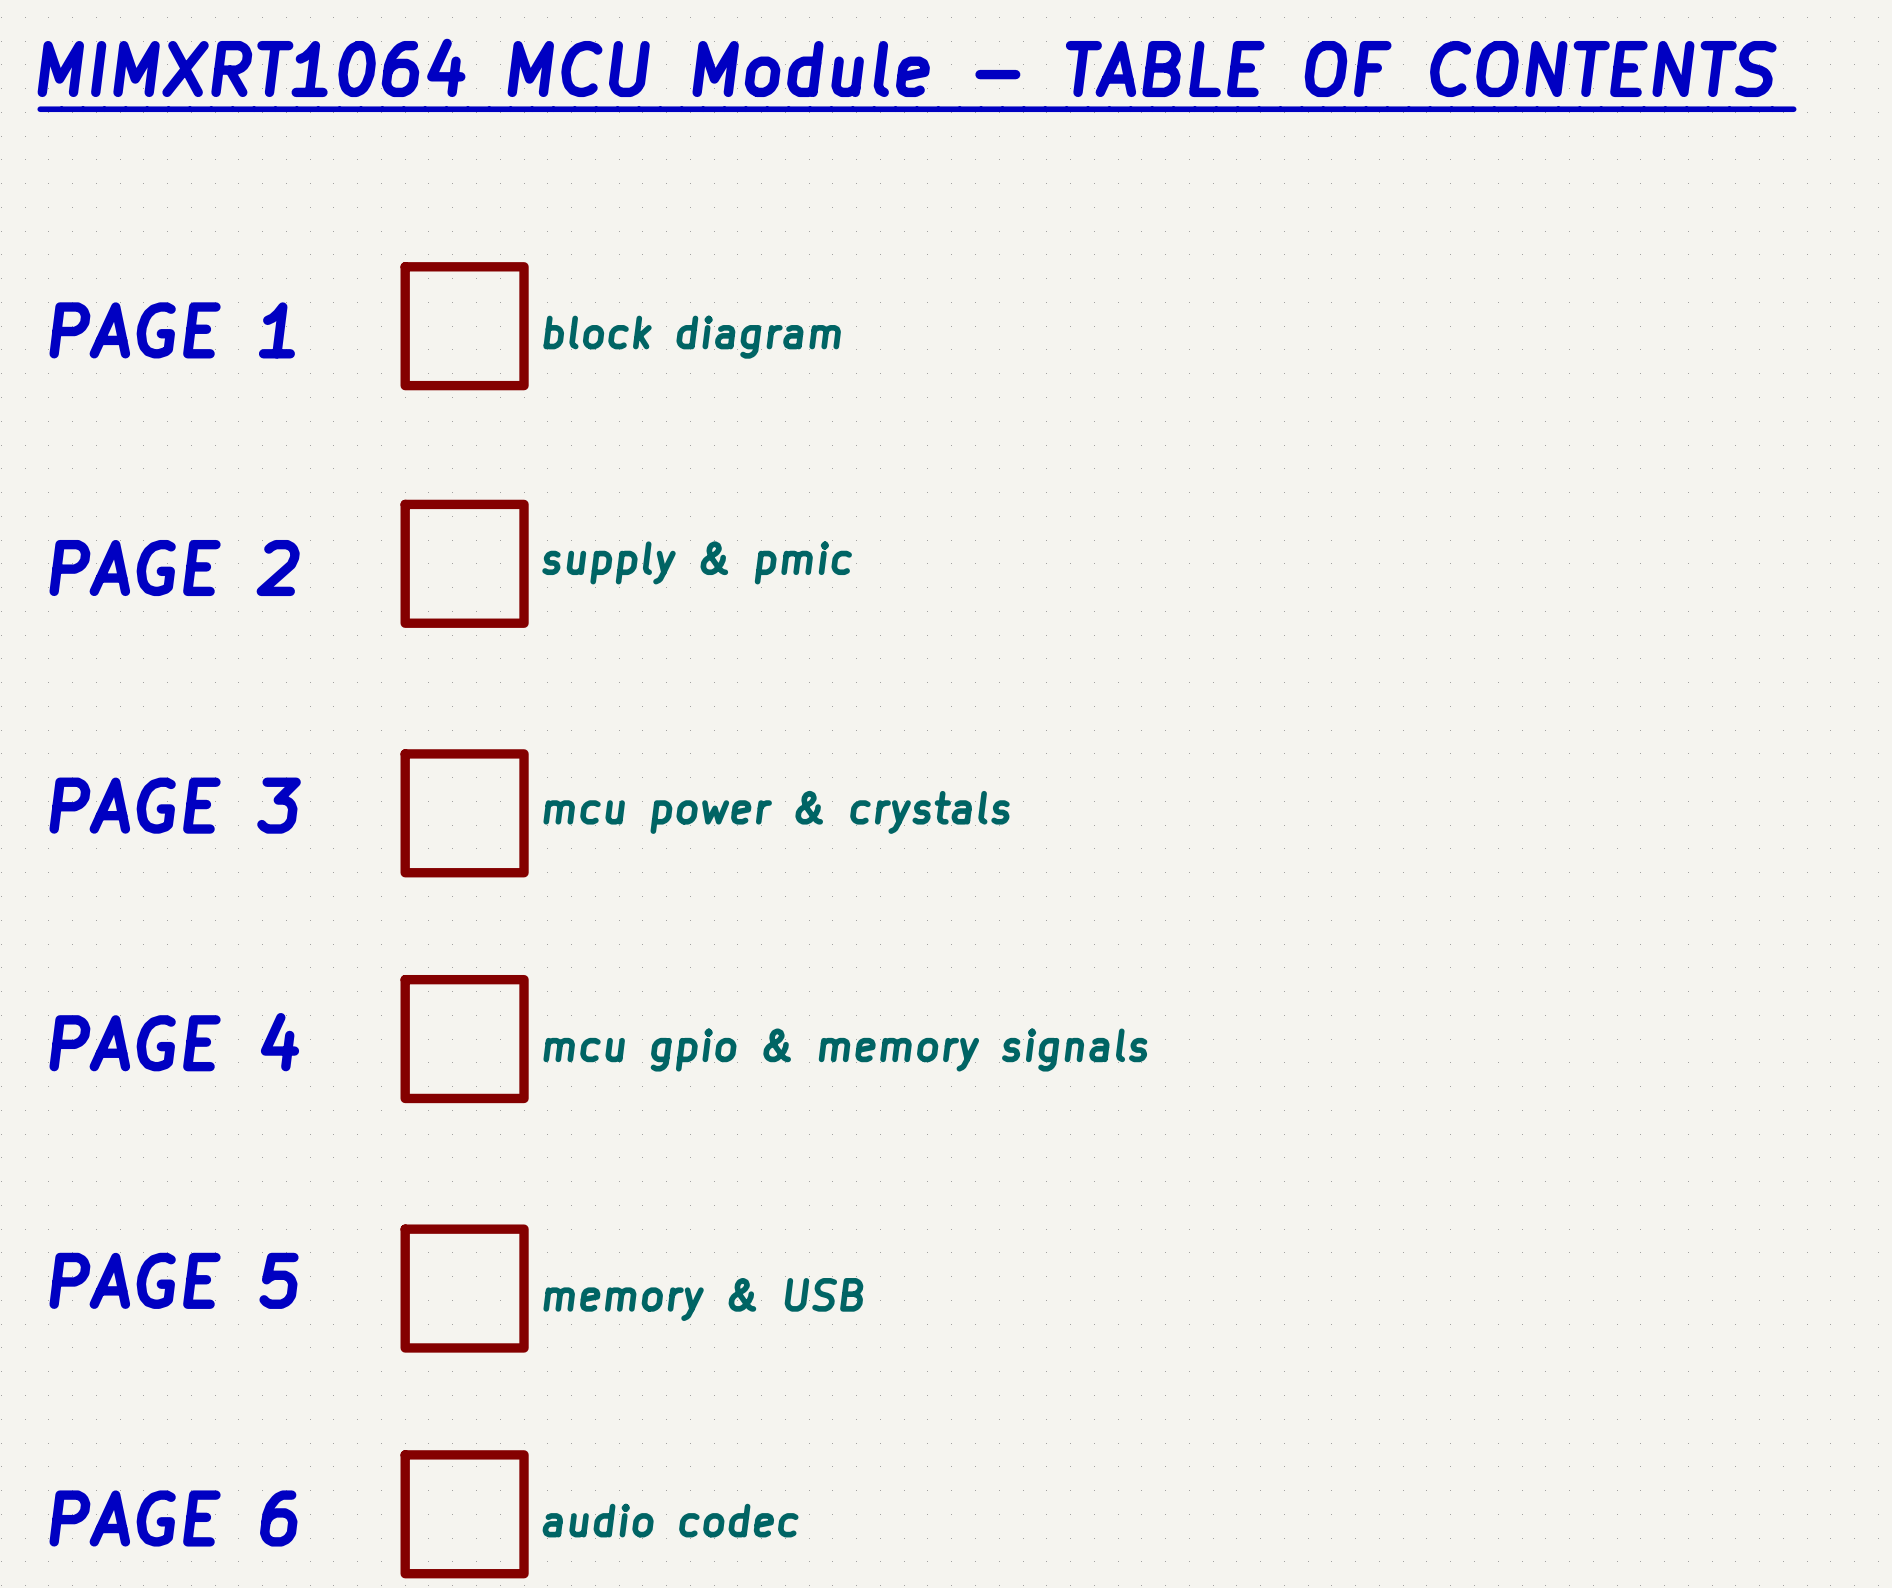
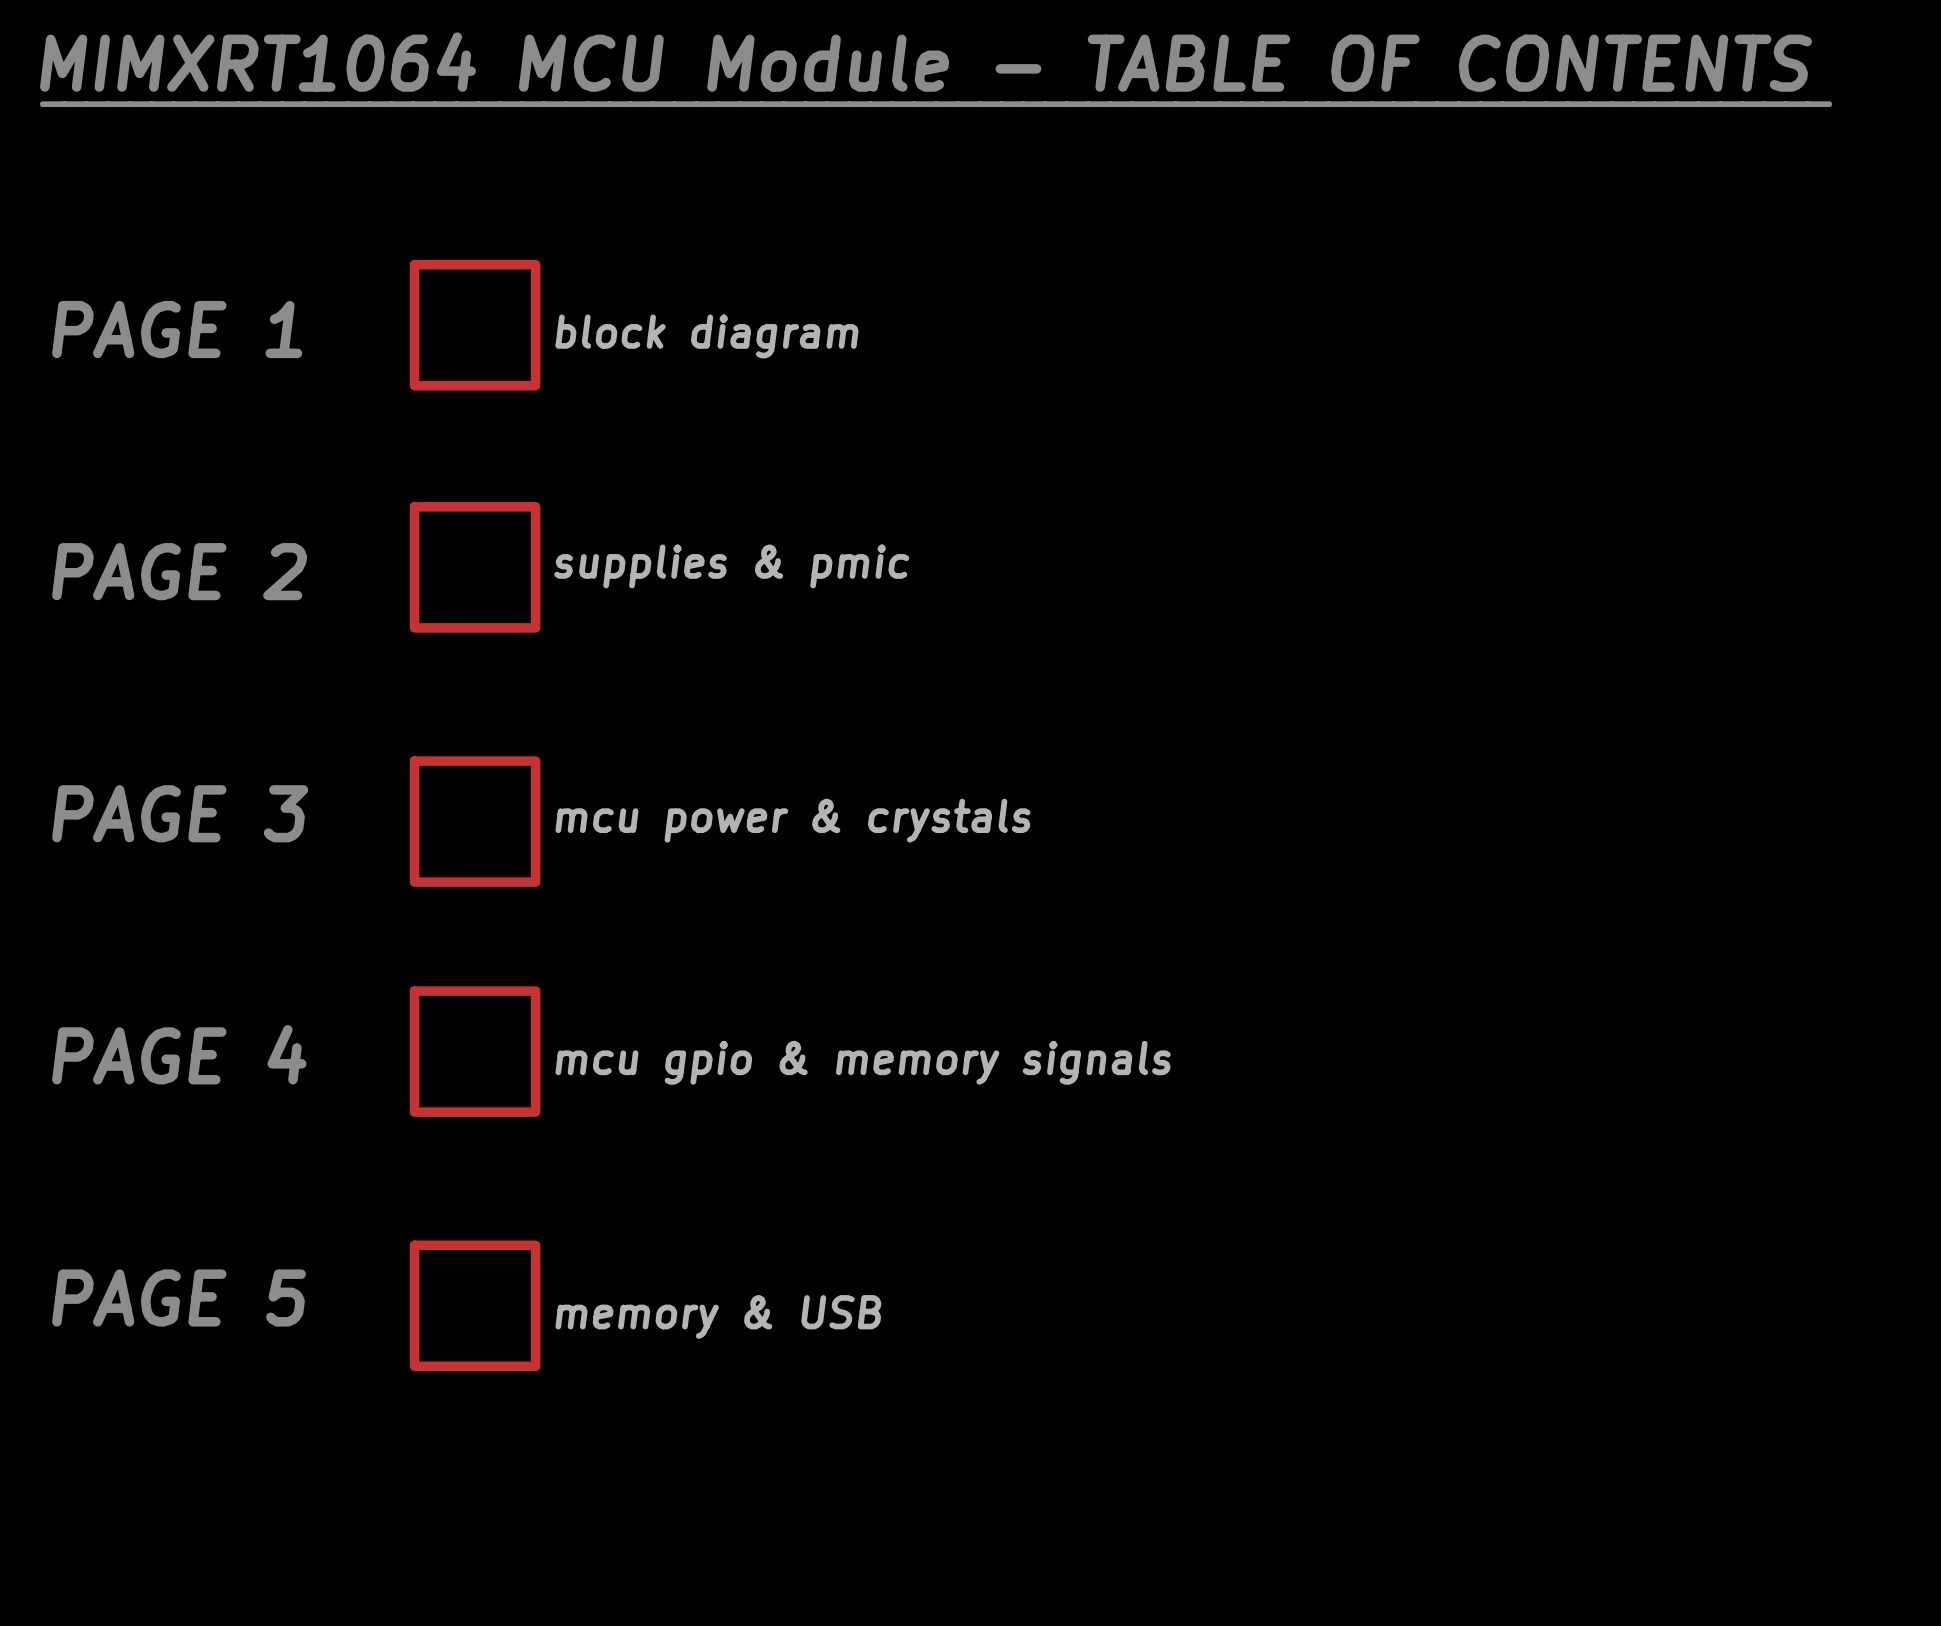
sheet supply & pmic name: supply & pmic (697, 562) -> supplies & pmic (731, 566)
sheet audio codec: (464, 1514) -> none
text: PAGE 6 (173, 1518) -> none

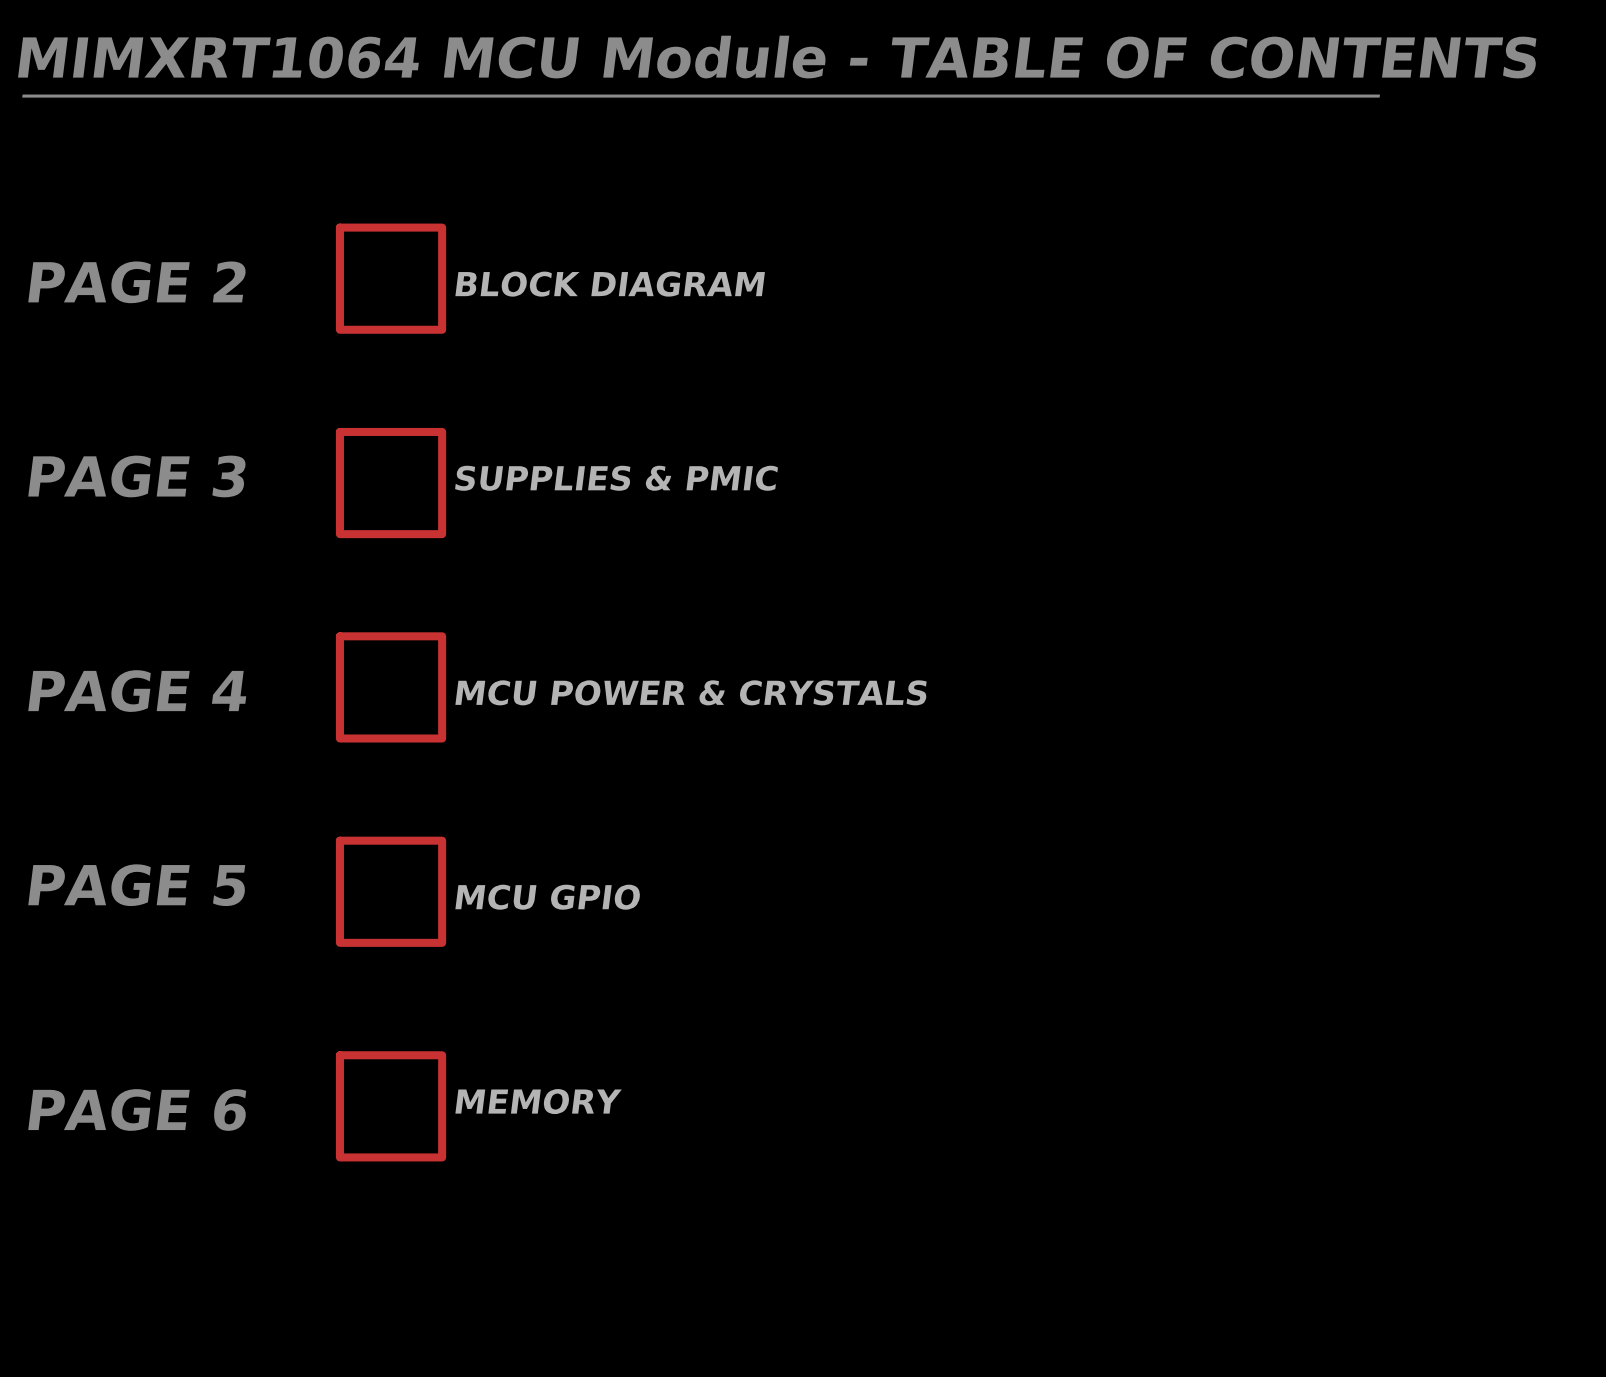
text: PAGE 1 (177, 329) -> PAGE 2 (137, 282)
sheet block diagram name: block diagram (707, 336) -> BLOCK DIAGRAM (610, 284)
sheet supplies & pmic name: supplies & pmic (731, 566) -> SUPPLIES & PMIC (616, 478)
text: PAGE 2 (179, 571) -> PAGE 3 (137, 476)
sheet MCU POWER & CRYSTALS: none -> (391, 687)
text: PAGE 3 (180, 813) -> PAGE 4 (137, 691)
sheet mcu power & crystals: (475, 821) -> none
text: PAGE 4 (179, 1054) -> PAGE 5 (136, 885)
sheet mcu gpio & memory signals name: mcu gpio & memory signals (863, 1062) -> MCU GPIO (547, 897)
text: PAGE 5 (179, 1297) -> PAGE 6 (137, 1109)
sheet memory & USB name: memory & USB (718, 1317) -> MEMORY (538, 1101)

